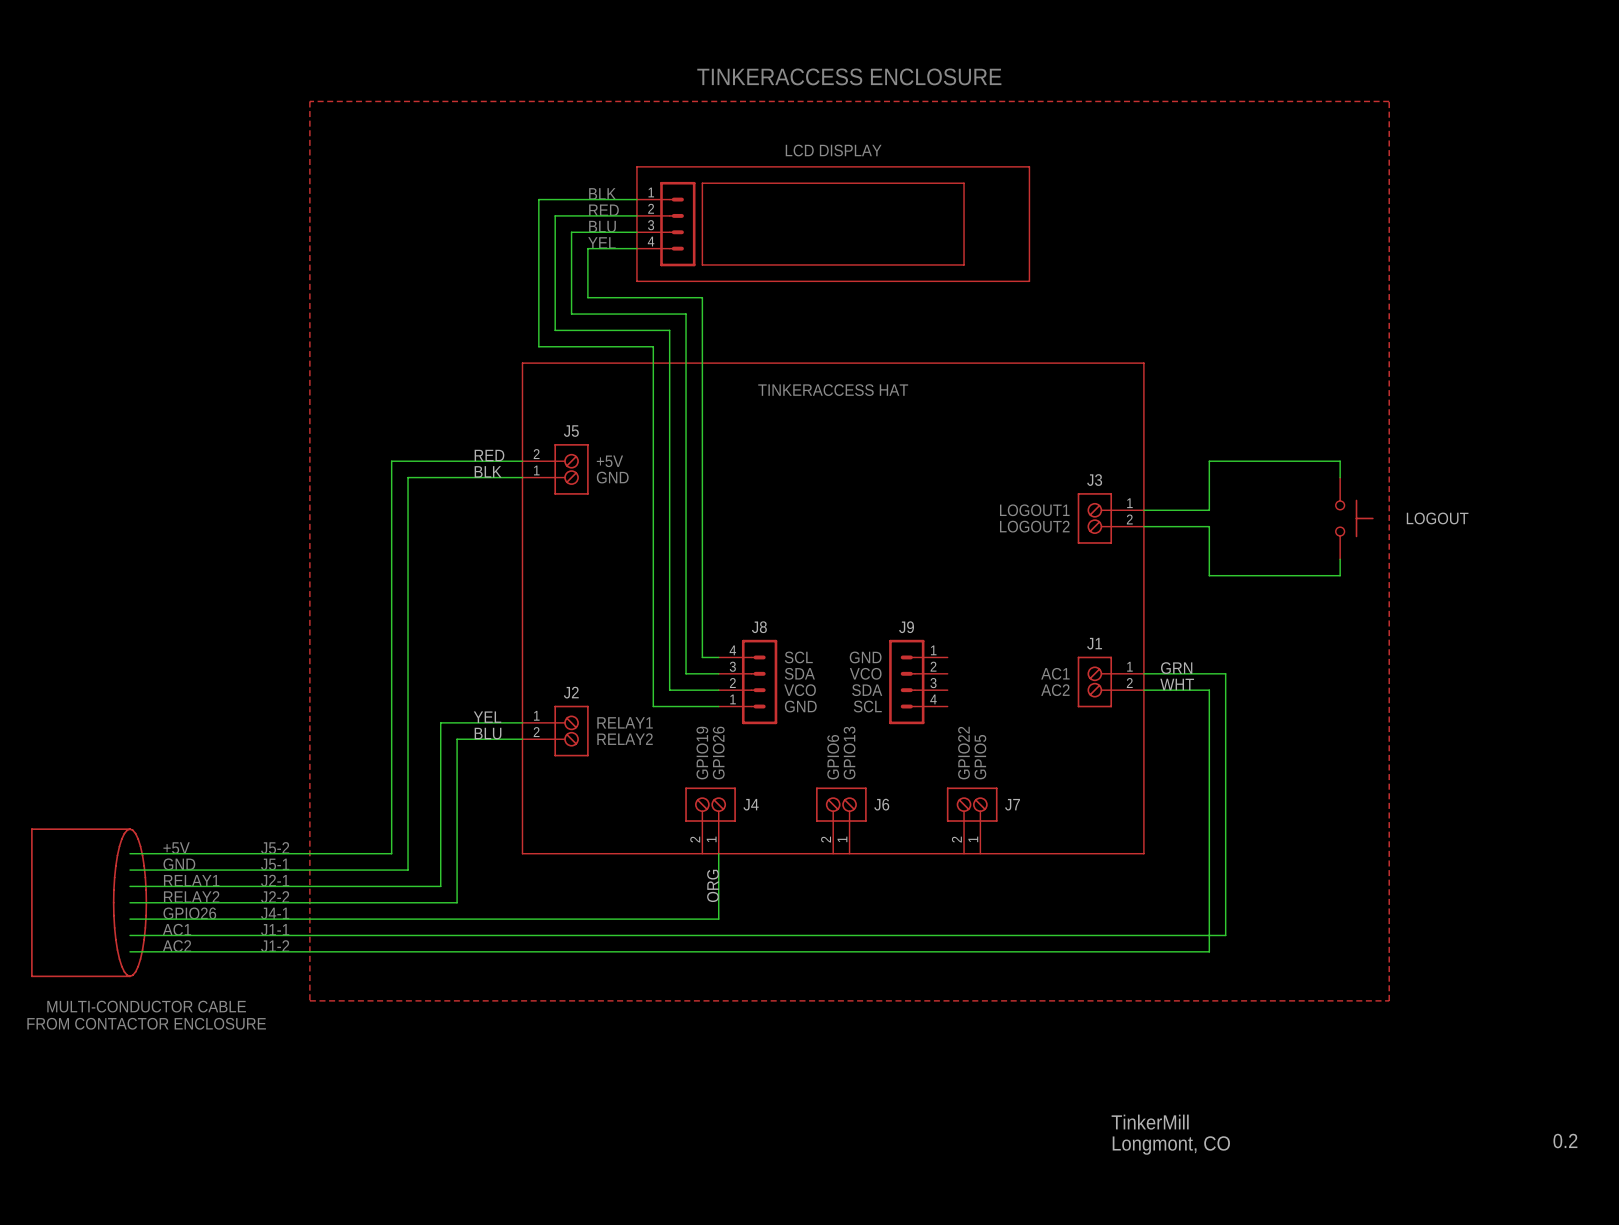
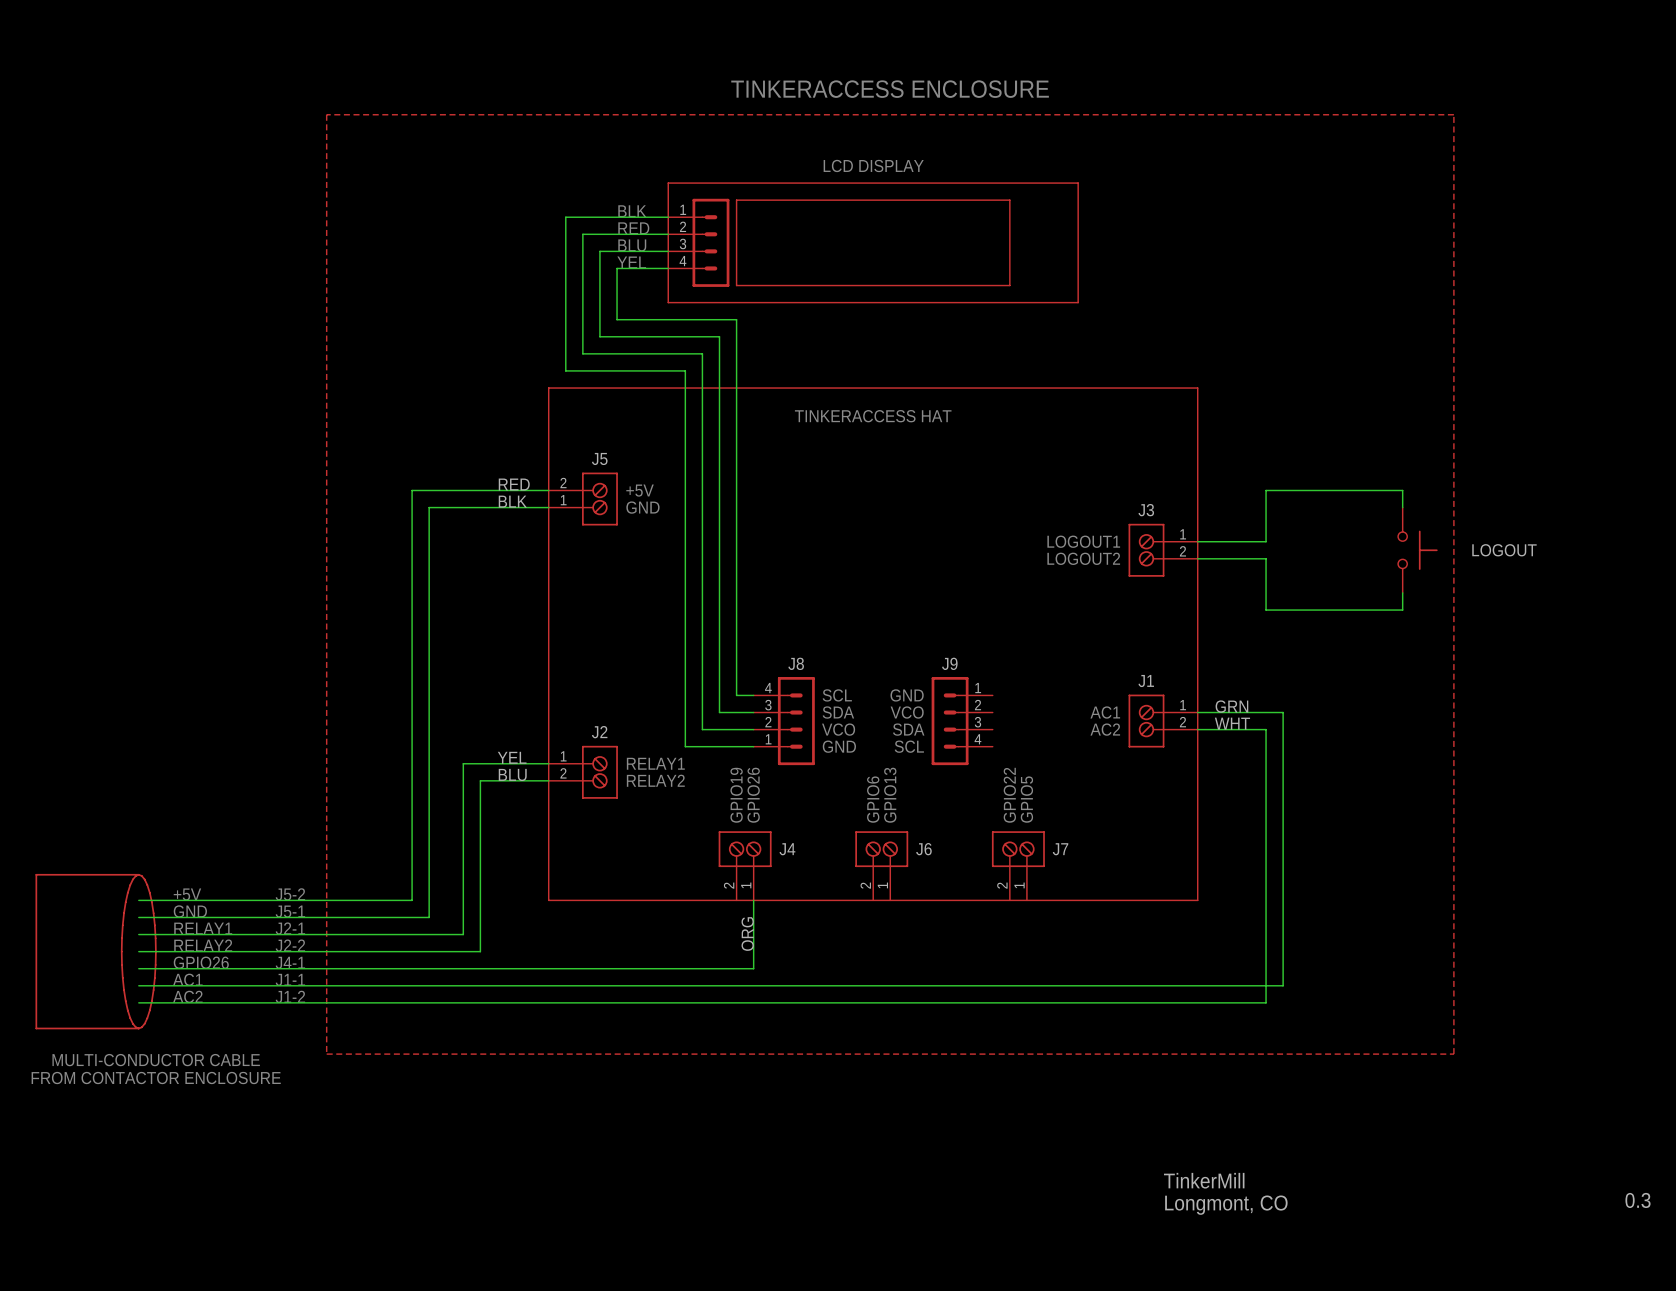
text: 0.2 (1565, 1141) -> 0.3 (1638, 1200)

